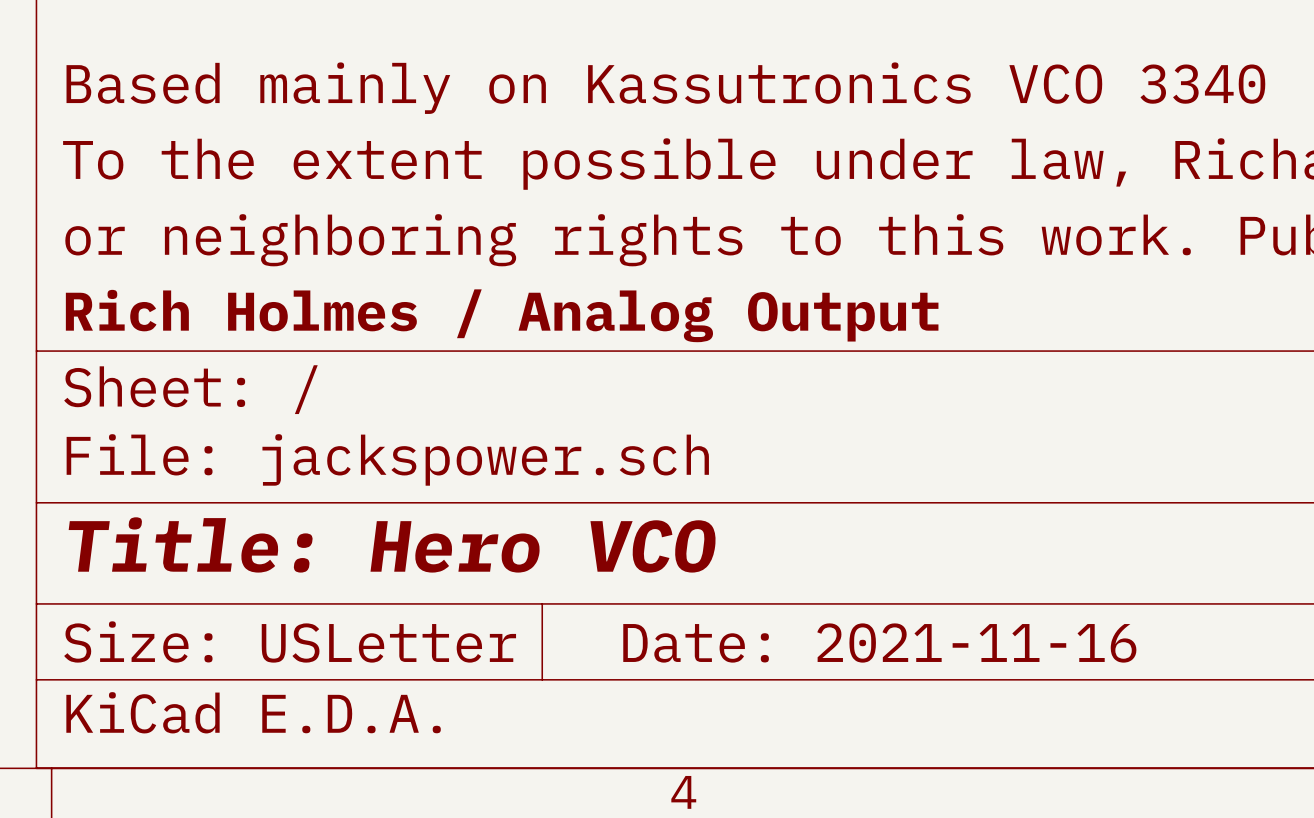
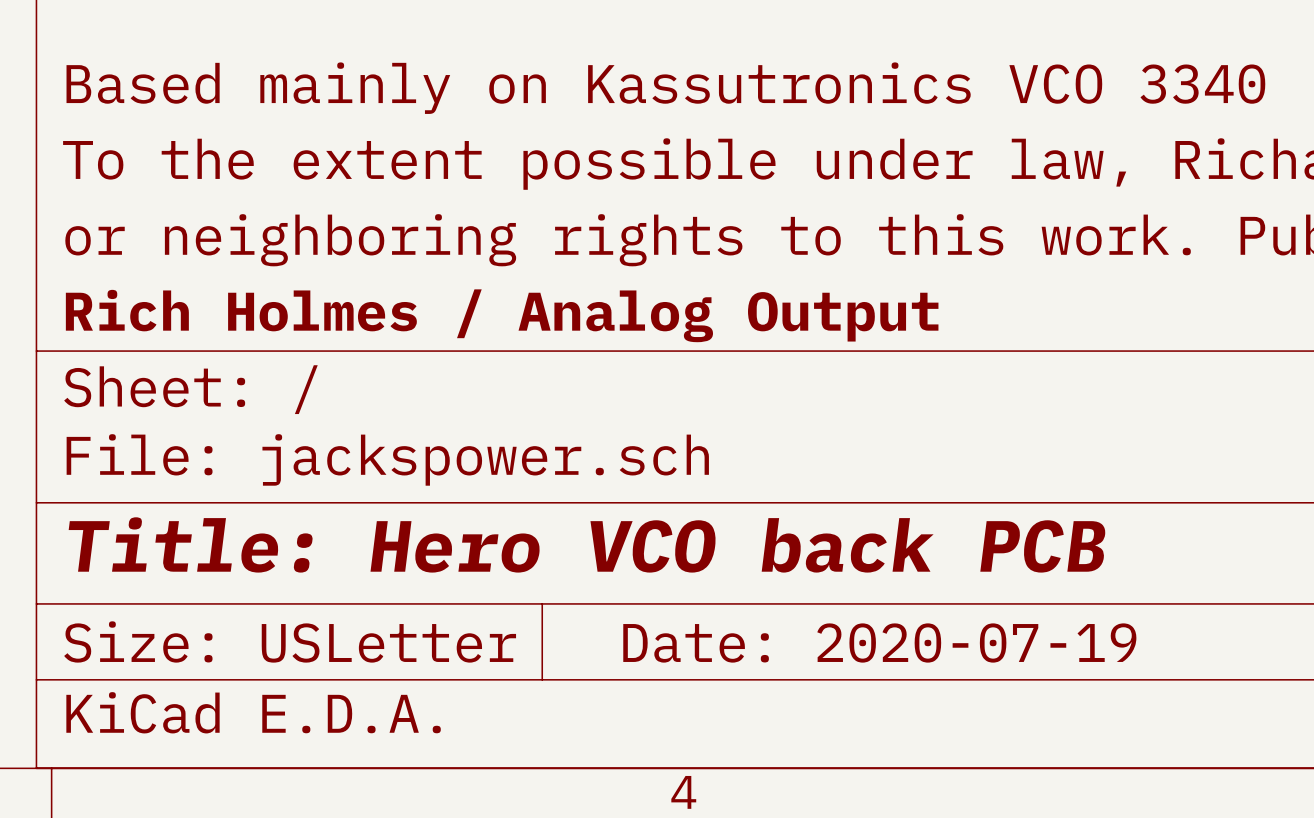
title block: Title: Hero VCO (392, 544) -> Title: Hero VCO back PCB (587, 544)
title block: Date: 2021-11-16 (879, 643) -> Date: 2020-07-19 (879, 643)

